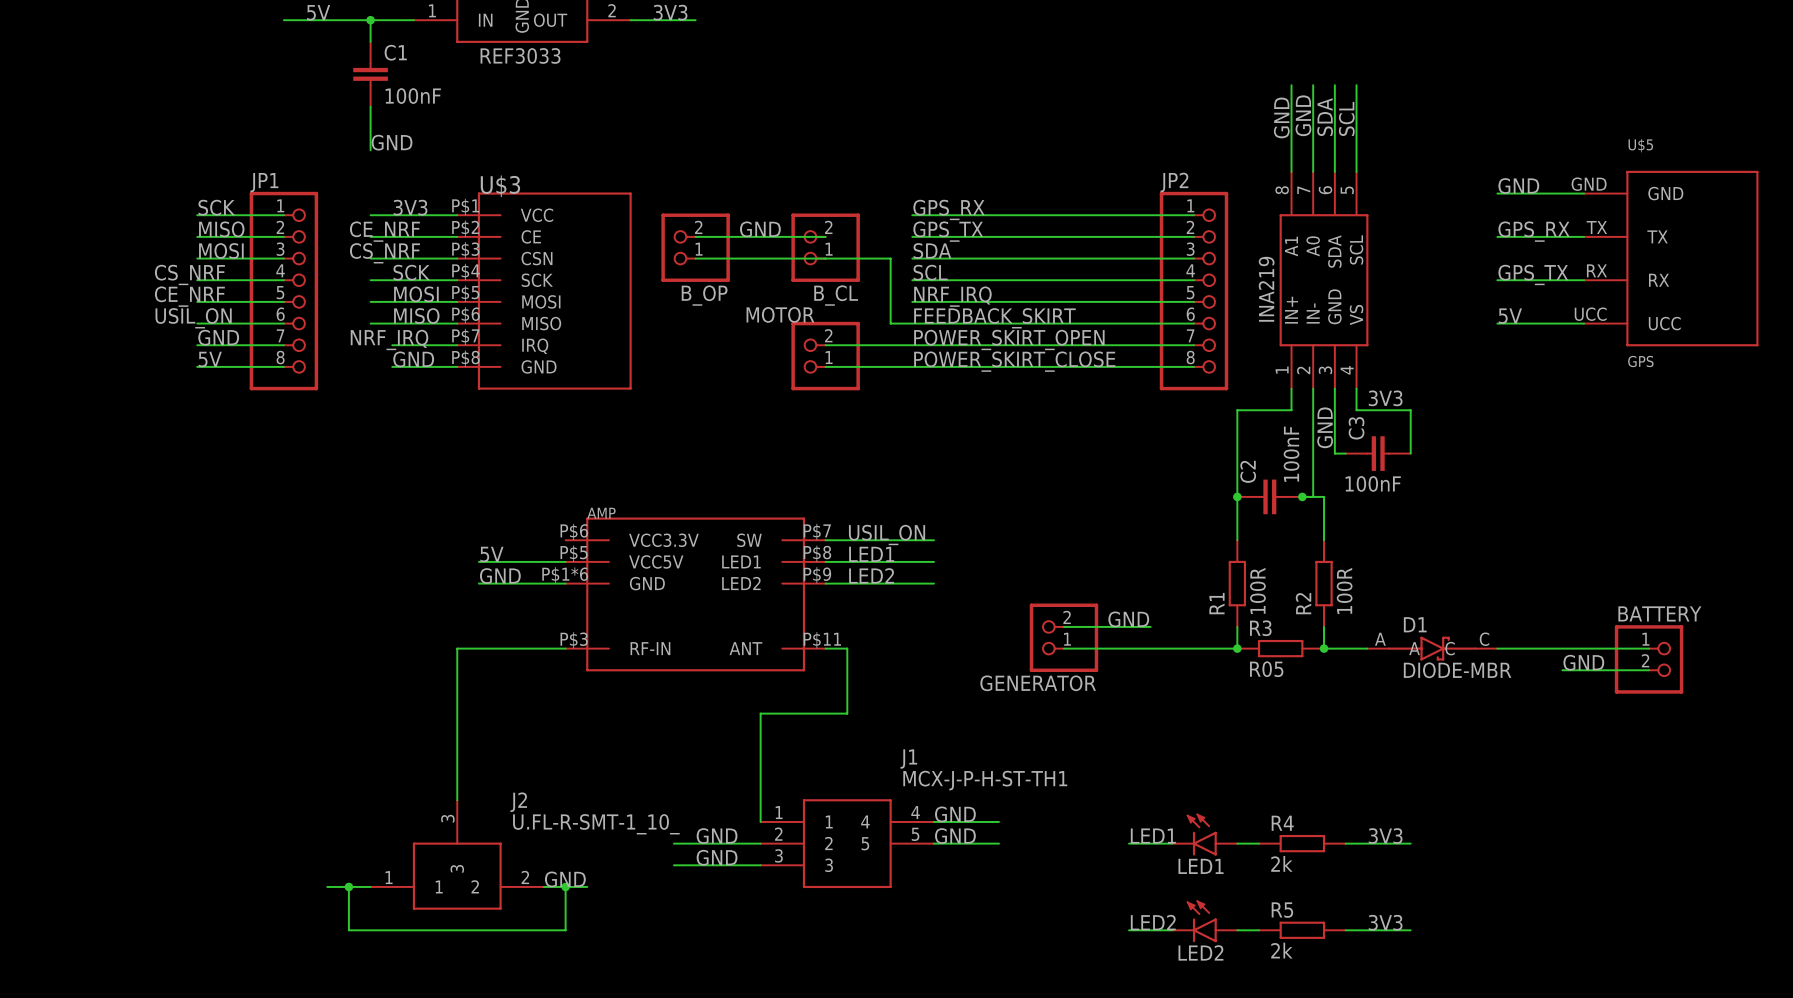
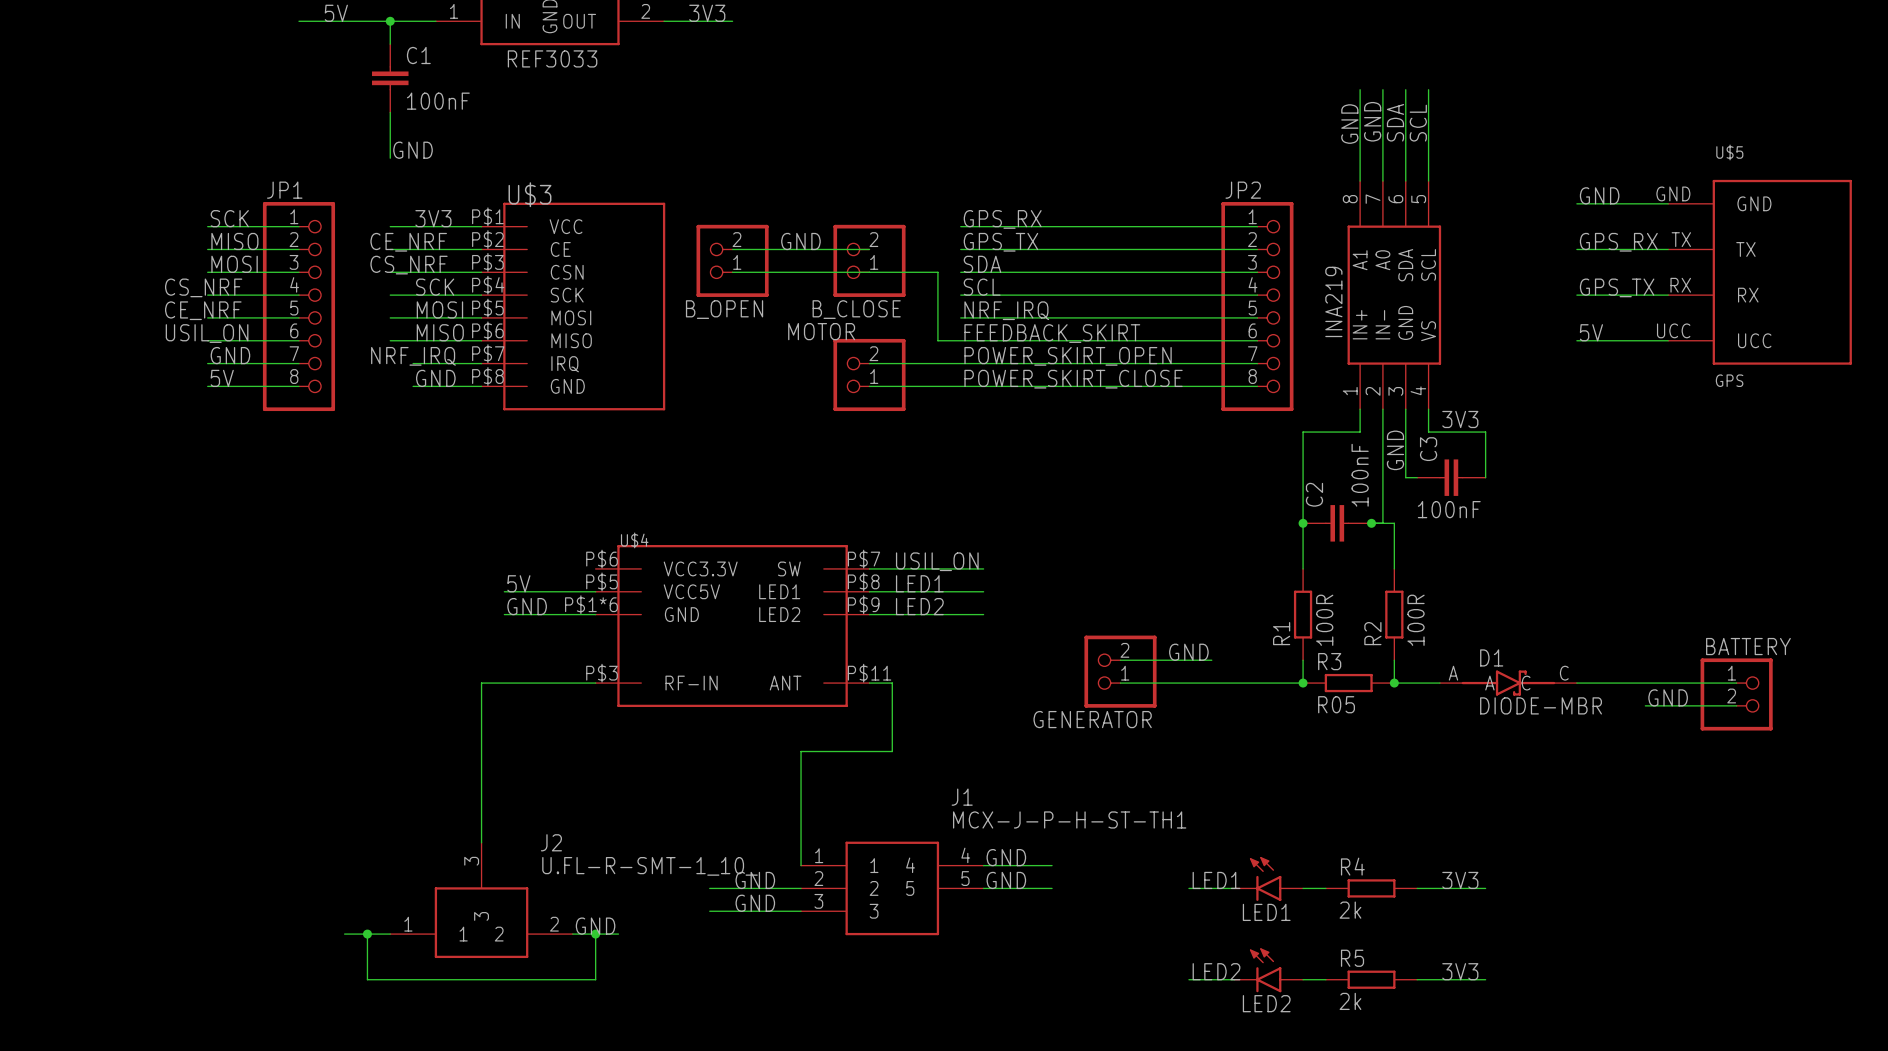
B_OP name: B_OP (704, 295) -> B_OPEN (724, 309)
B_CL name: B_CL (836, 295) -> B_CLOSE (856, 309)
AMP name: AMP (601, 513) -> U$4 (634, 540)

